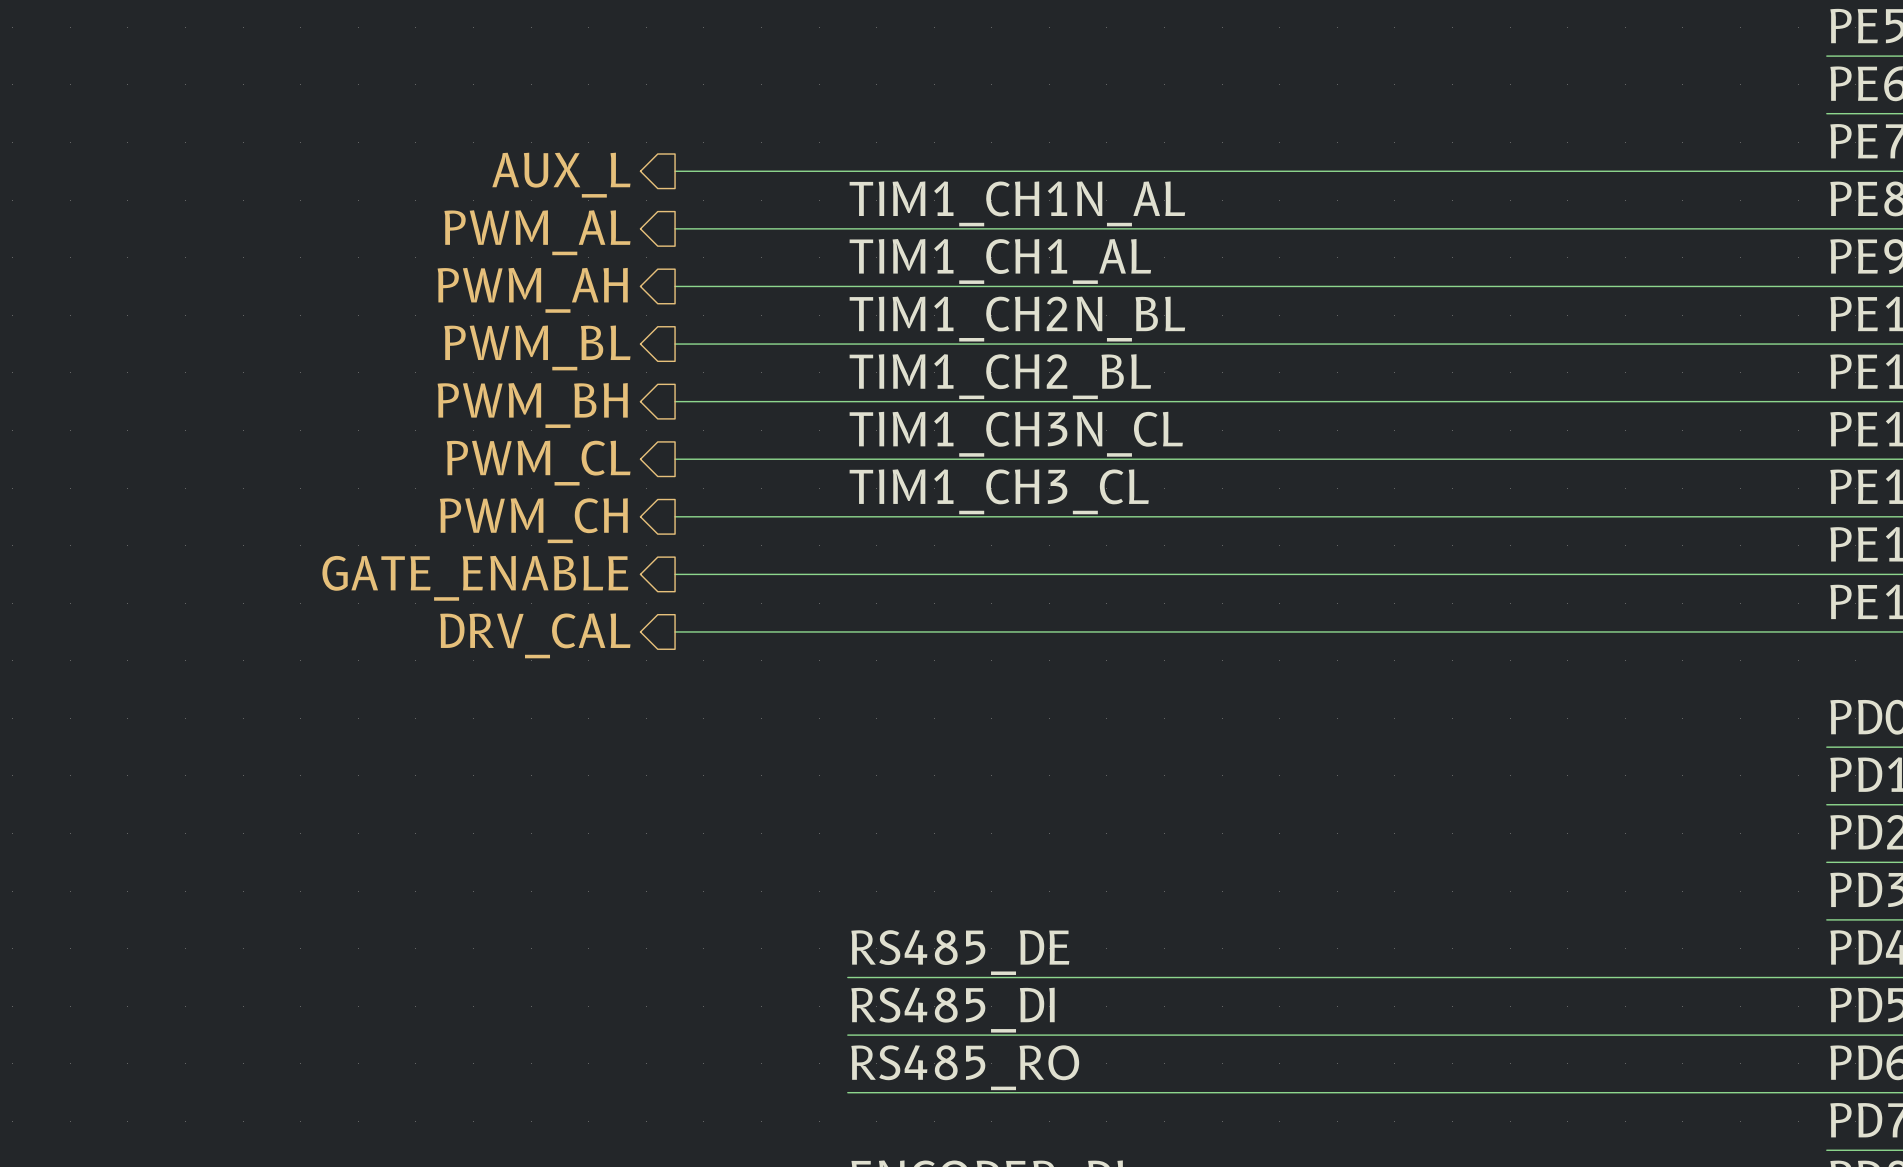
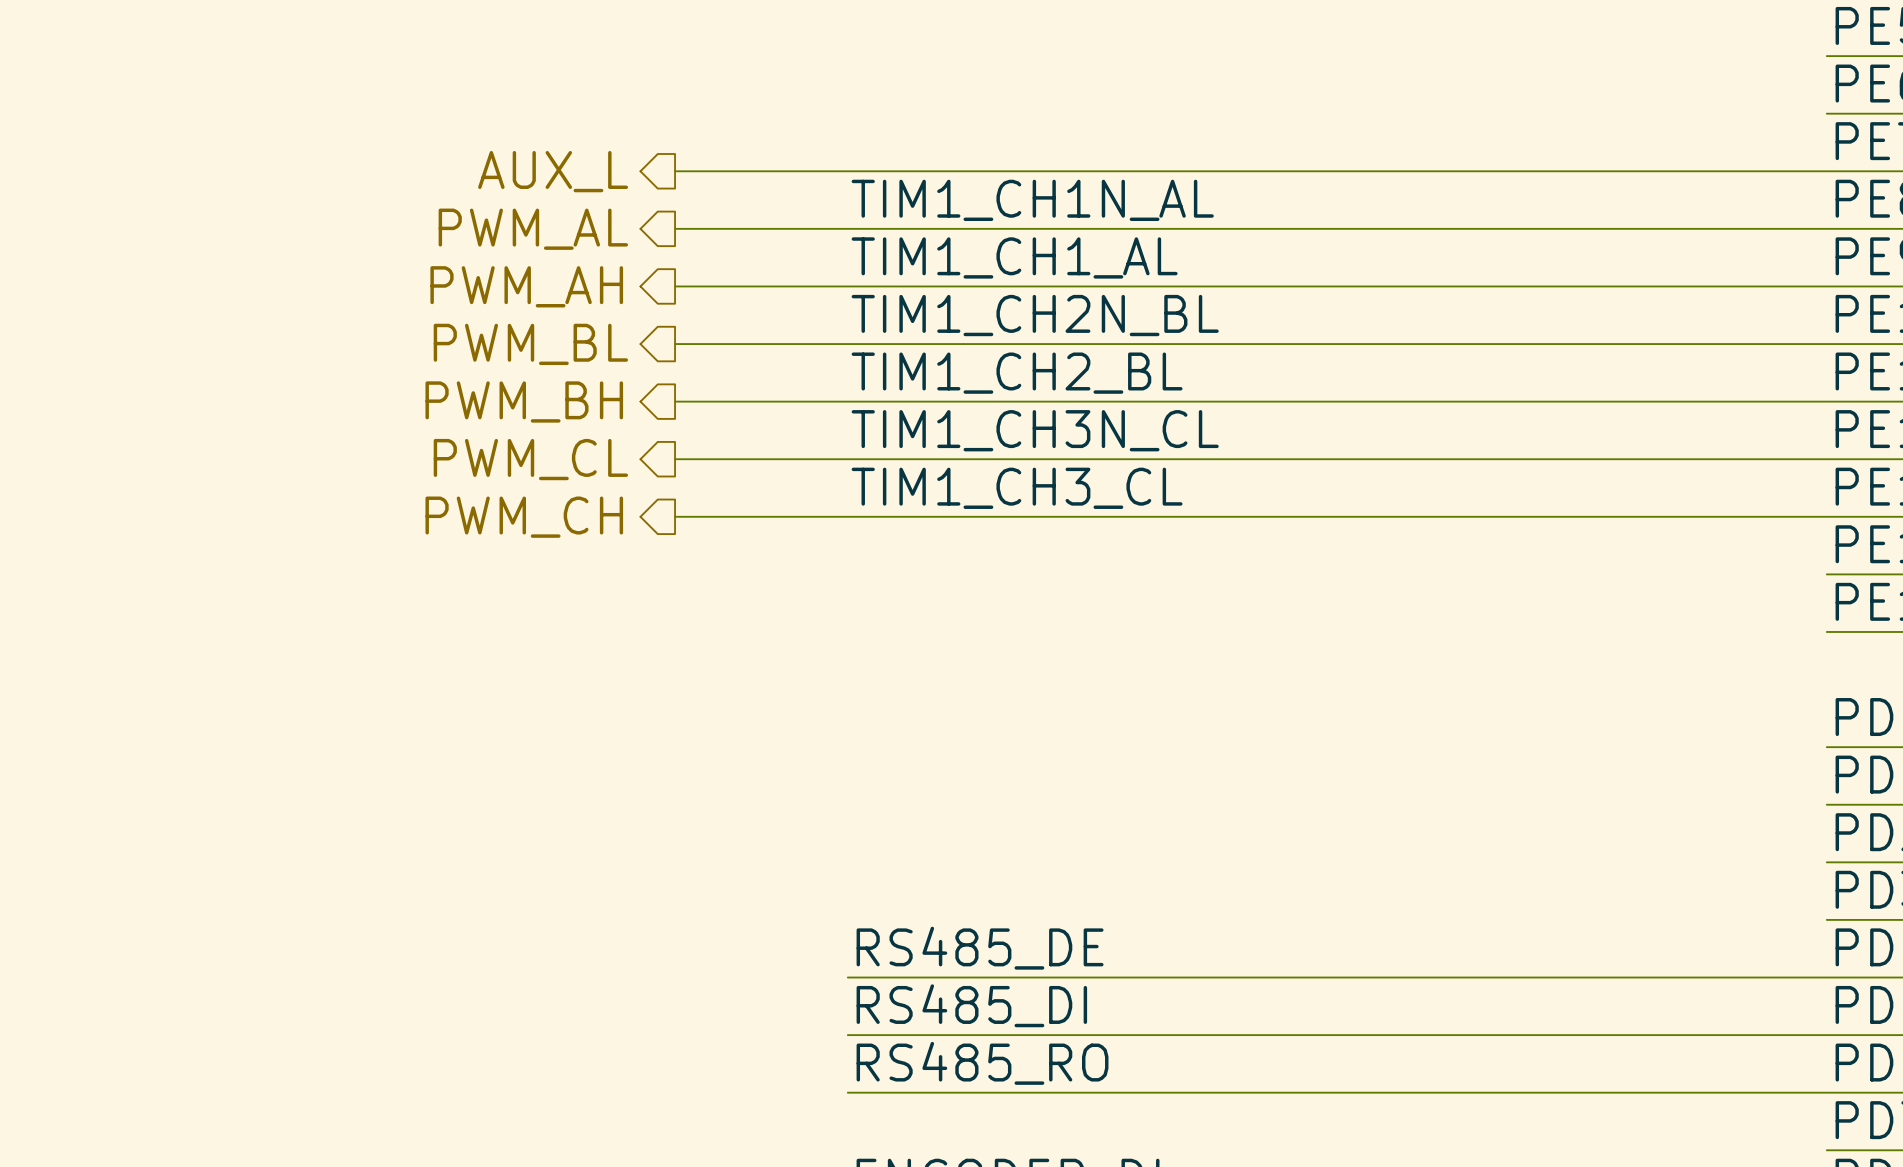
wire: (675, 574) (1826, 574) -> none
hierarchical label: GATE_ENABLE (475, 578) -> none
wire: (675, 631) (1826, 631) -> none
hierarchical label: DRV_CAL (535, 635) -> none

